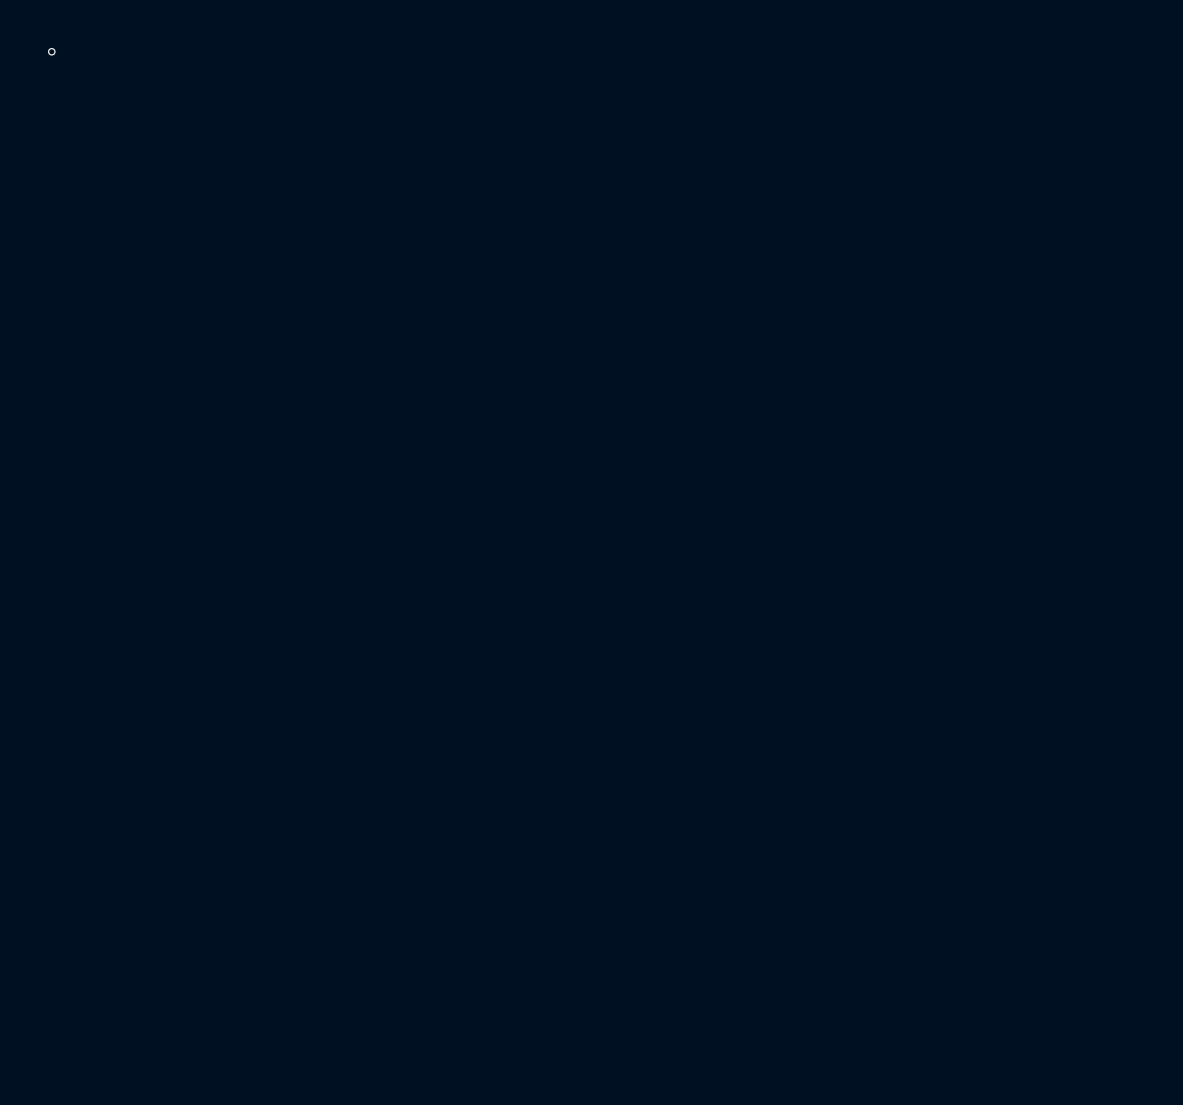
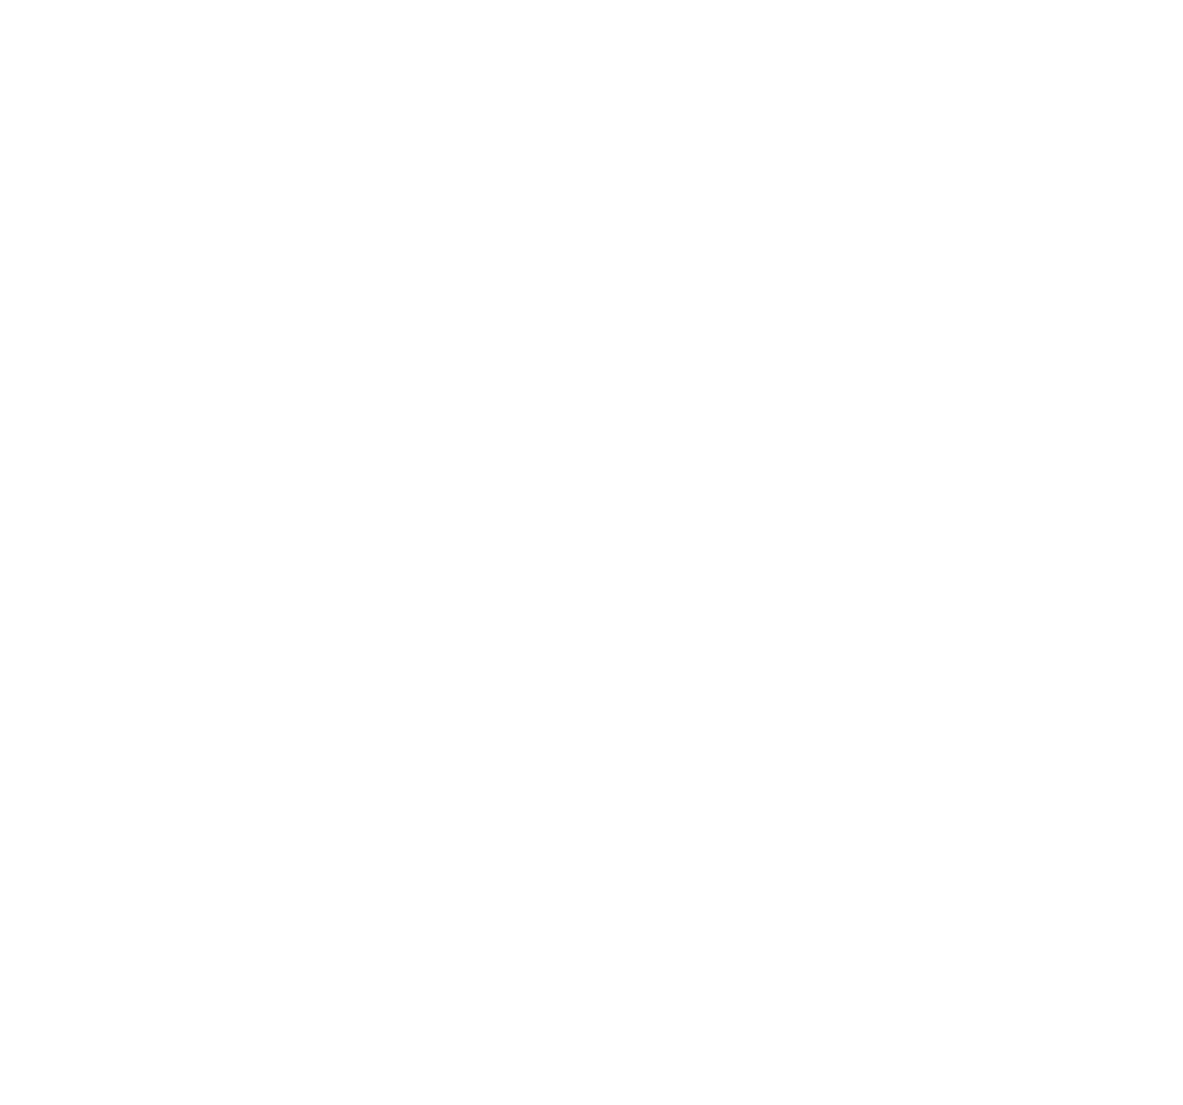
via: (51, 51) -> none

